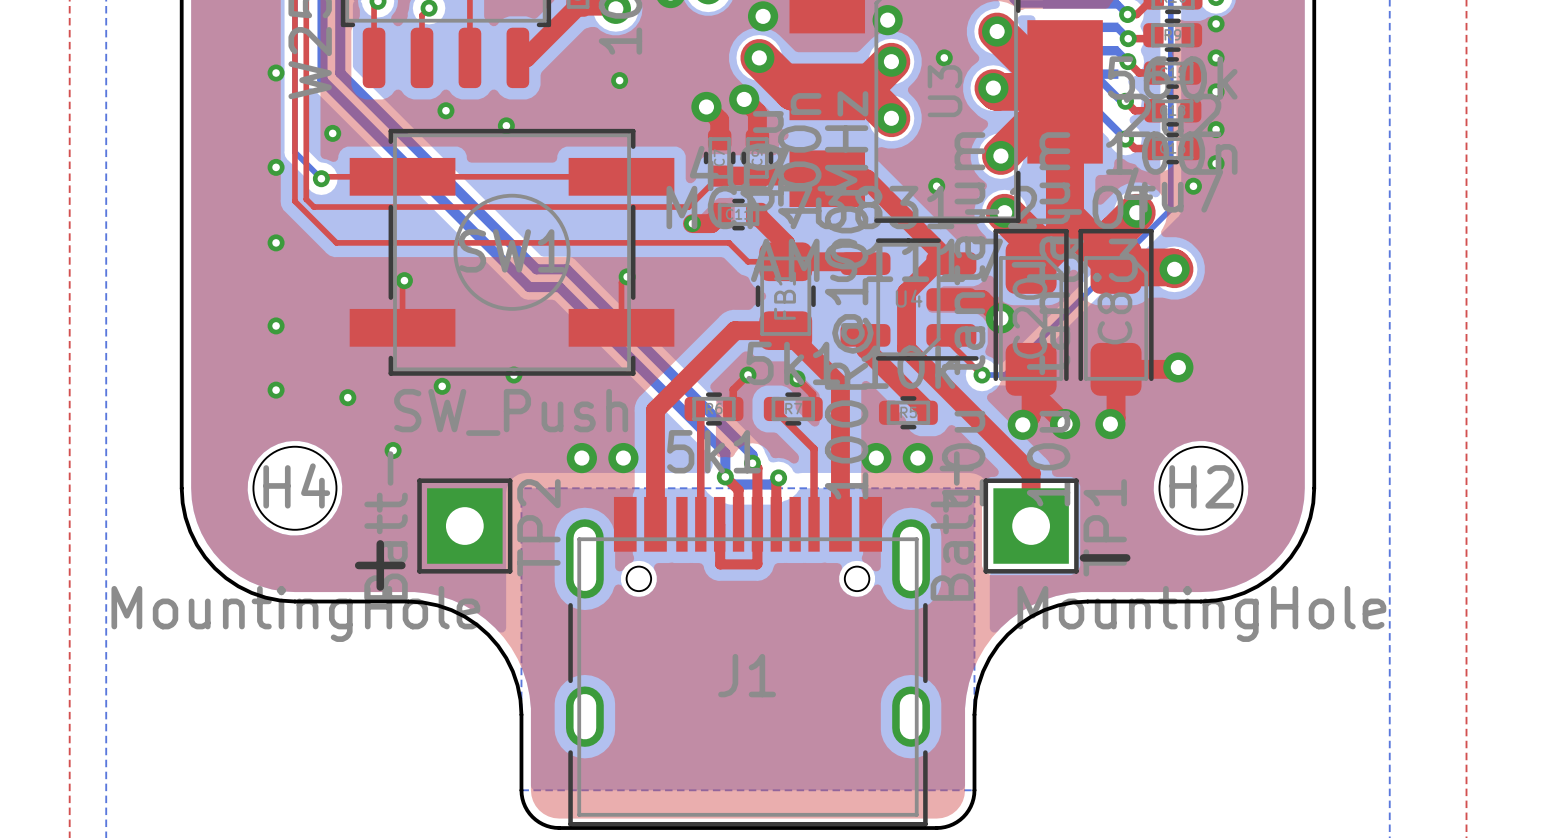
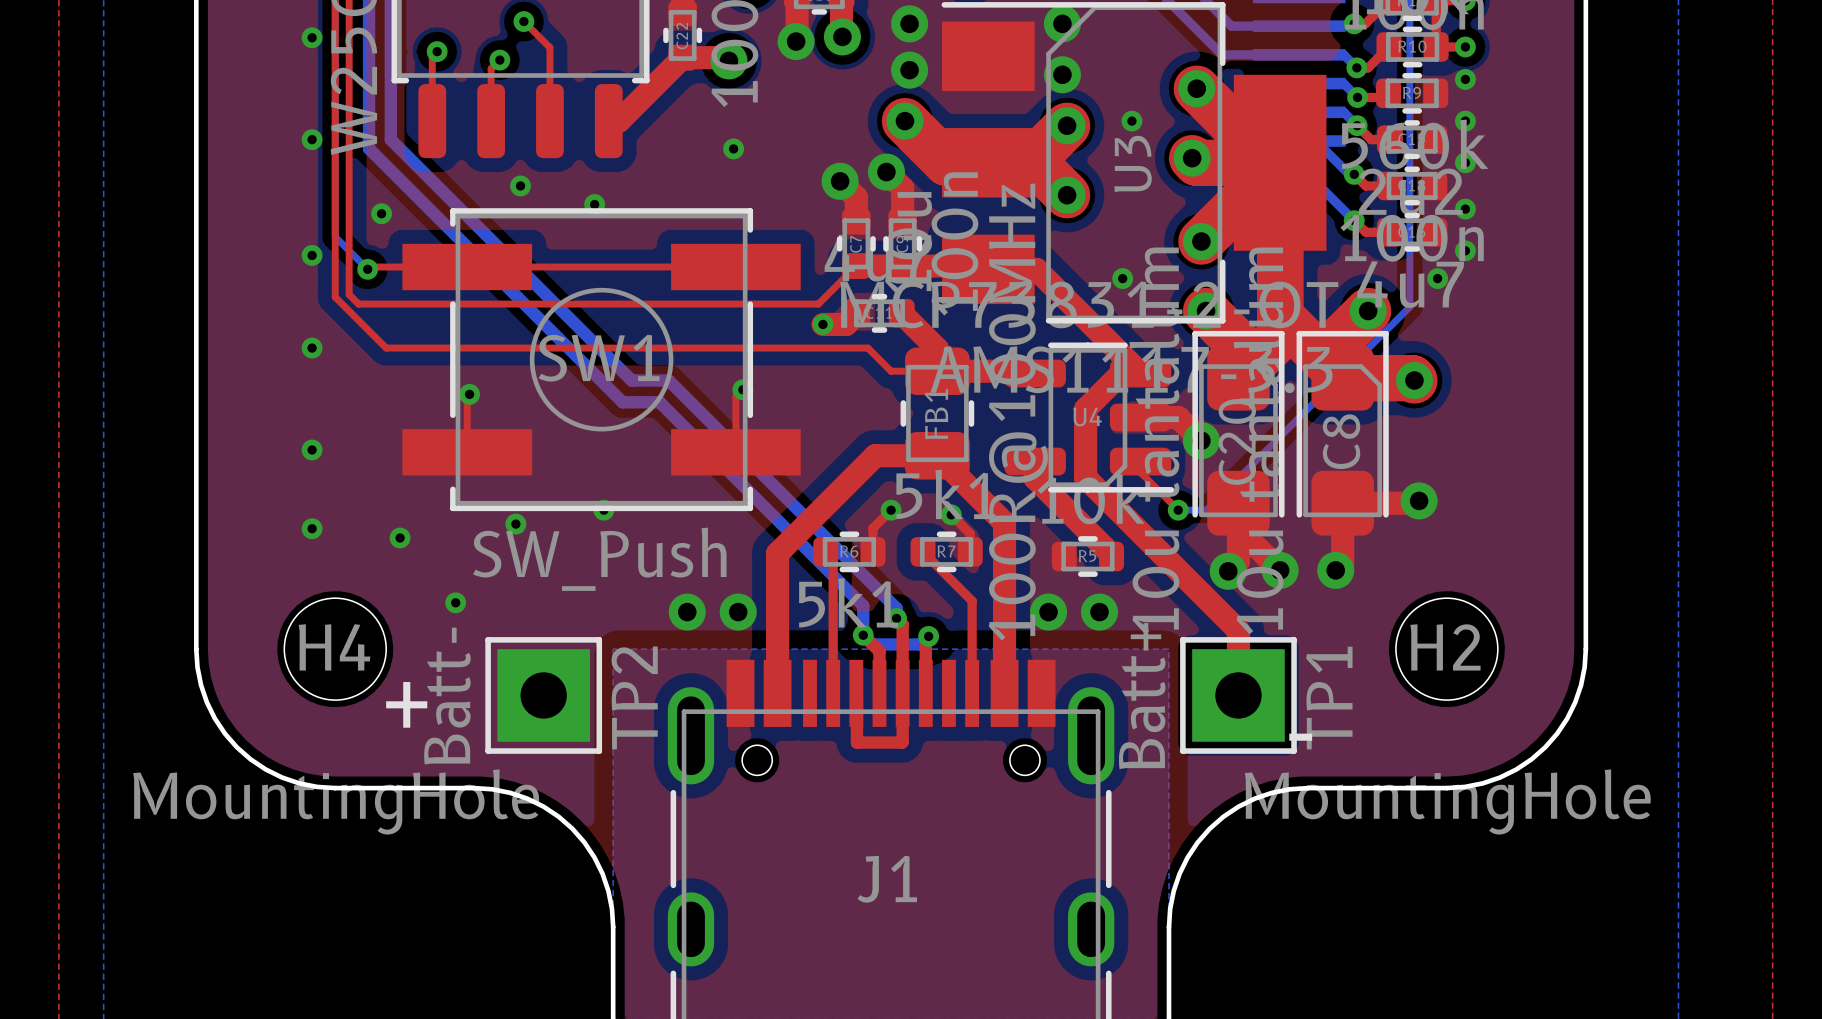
text position: + (380, 565) -> + (406, 704)

